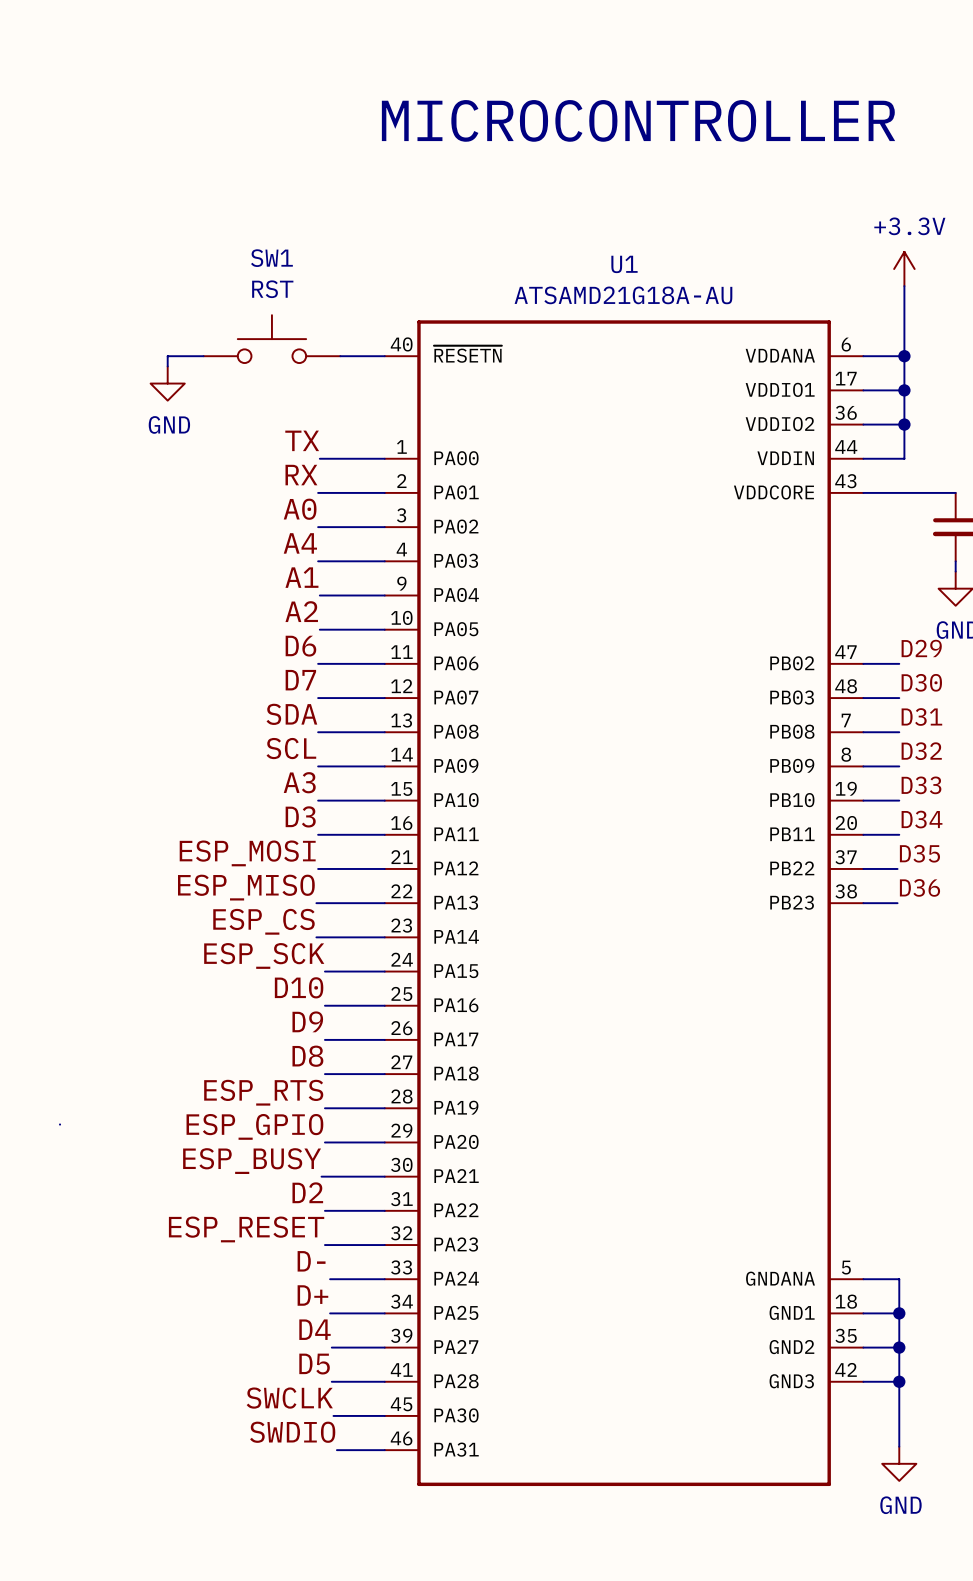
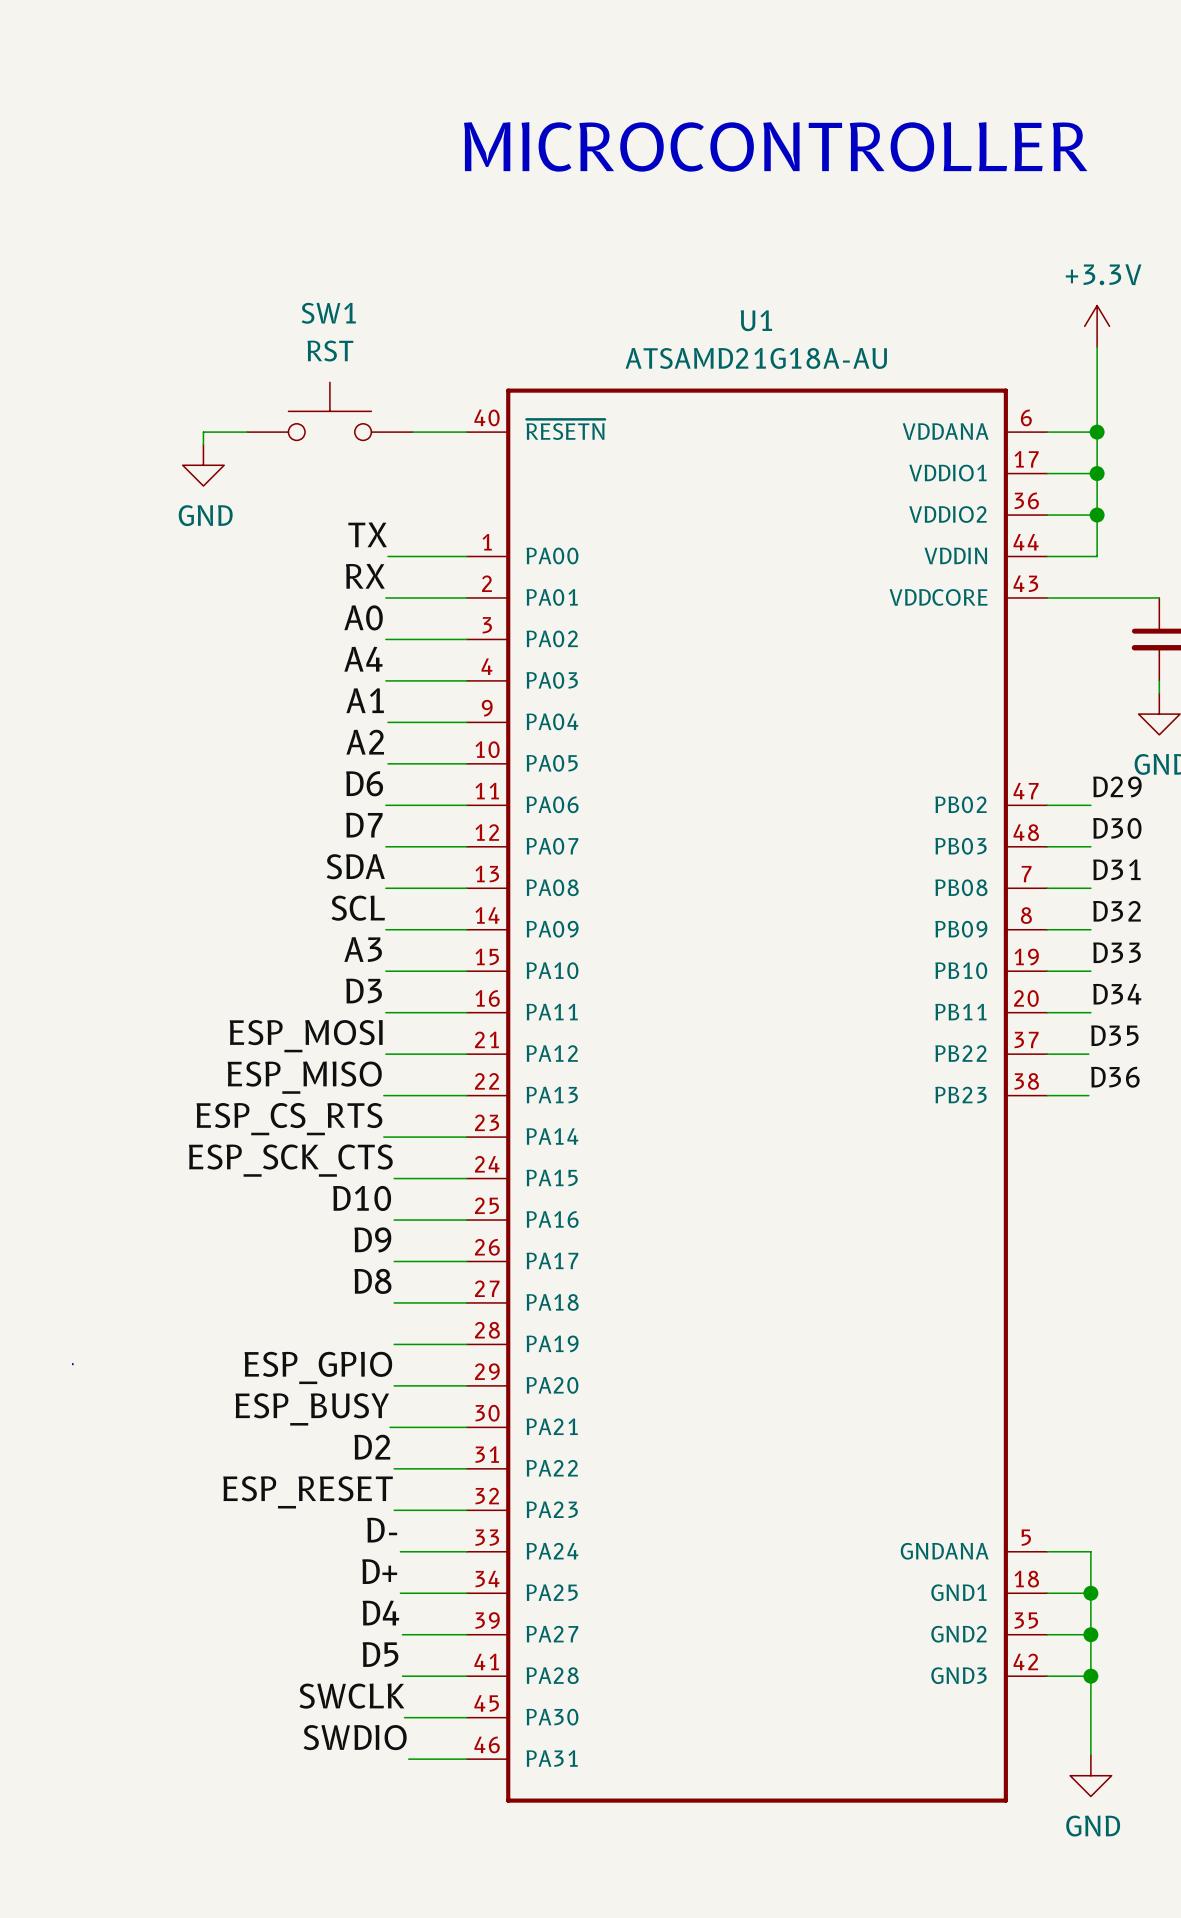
label: ESP_CS (263, 921) -> ESP_CS_RTS (289, 1119)
label: ESP_SCK (264, 955) -> ESP_SCK_CTS (290, 1160)
label: ESP_RTS (263, 1092) -> none

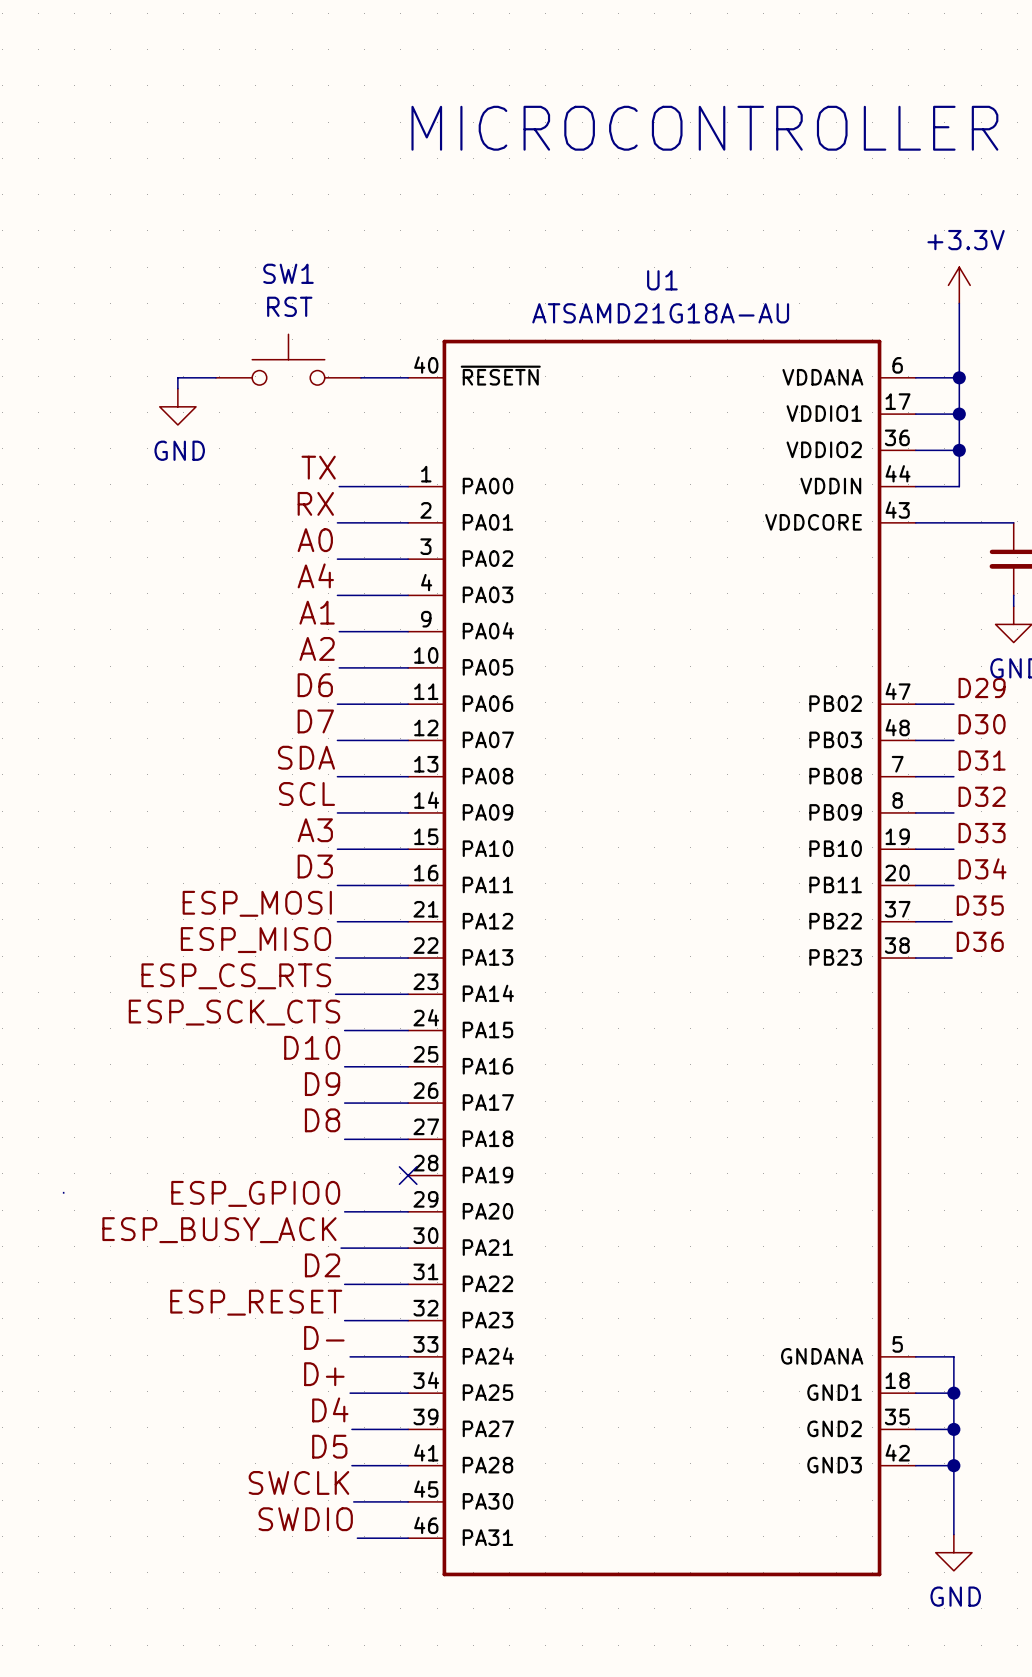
wire: (394, 1344) (466, 1344) -> none
no-connect mark: none -> (408, 1175)
label: ESP_GPIO (318, 1367) -> ESP_GPIO0 (255, 1193)
label: ESP_BUSY (312, 1409) -> ESP_BUSY_ACK (219, 1230)

